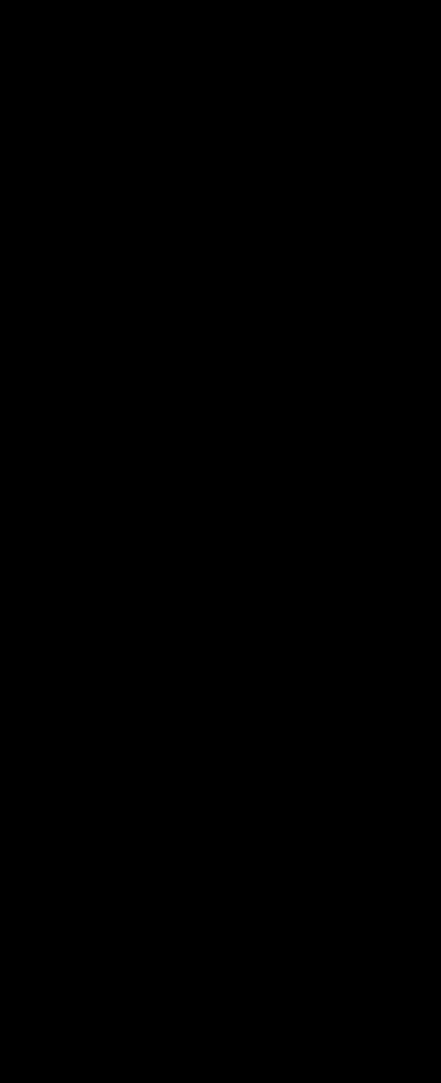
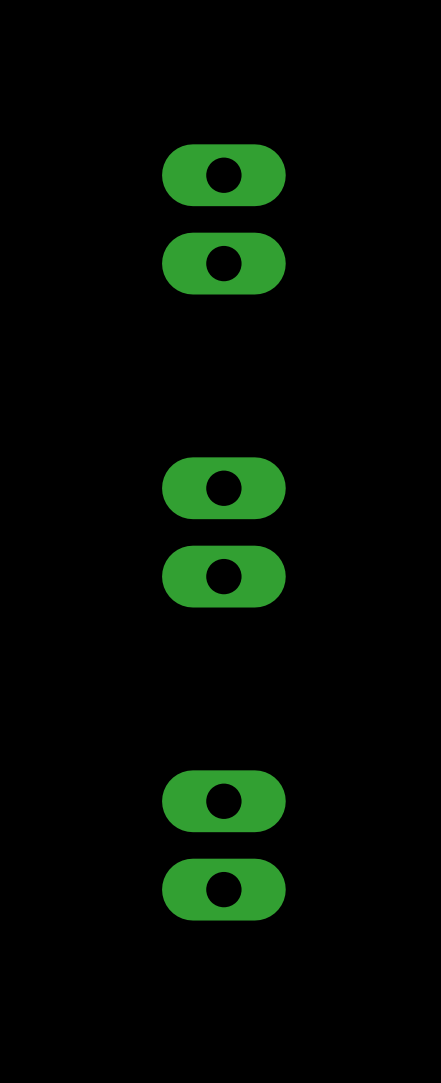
part: none -> (223, 219)
part: none -> (223, 532)
part: none -> (223, 845)

